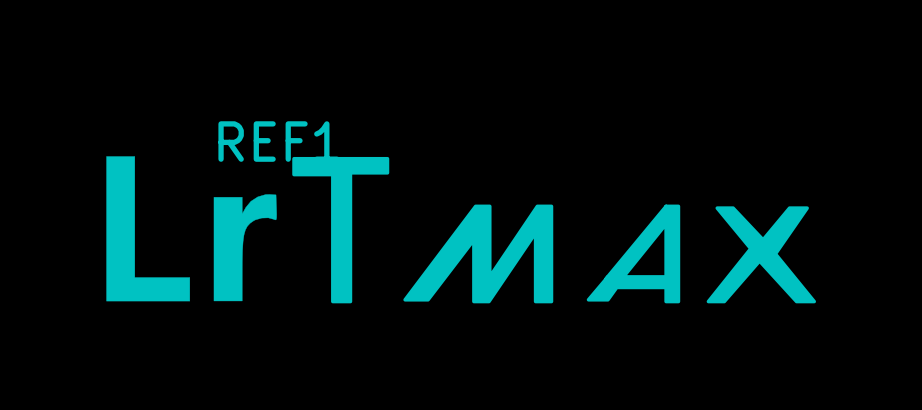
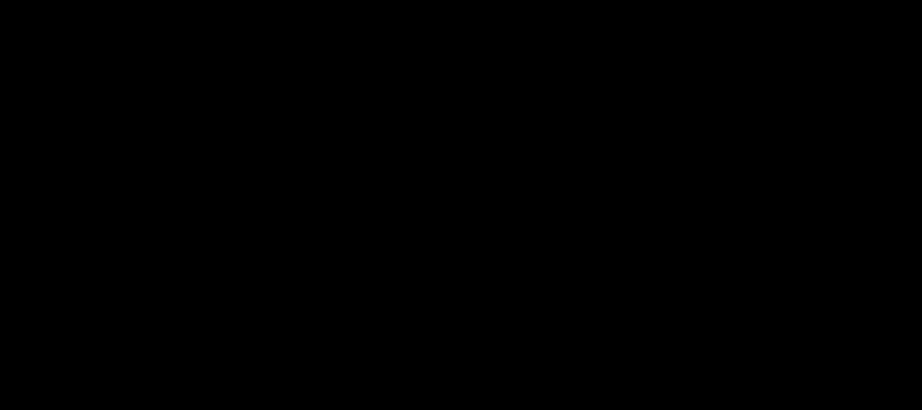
REF1: (461, 229) -> none

